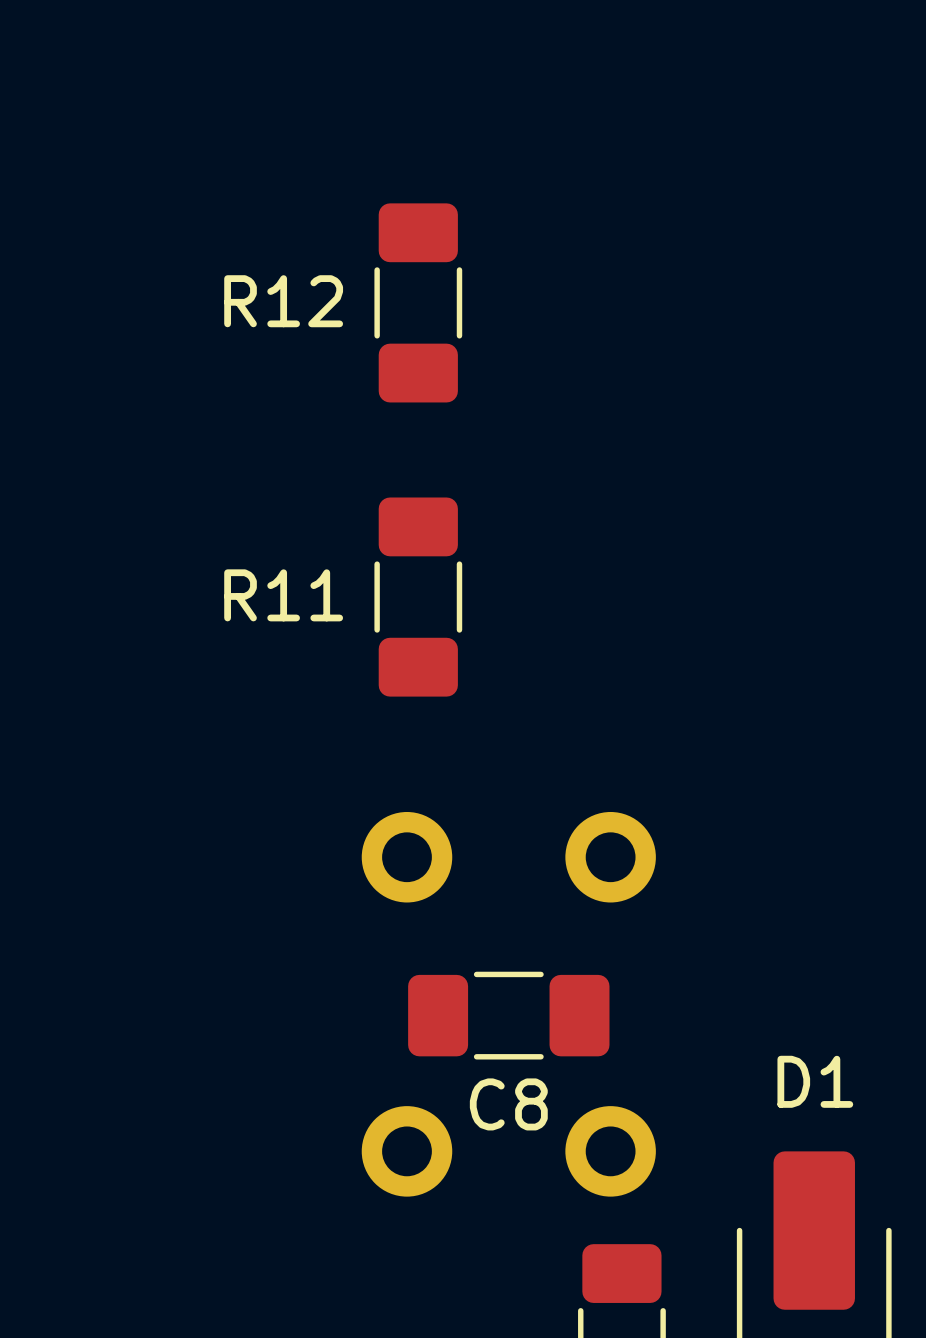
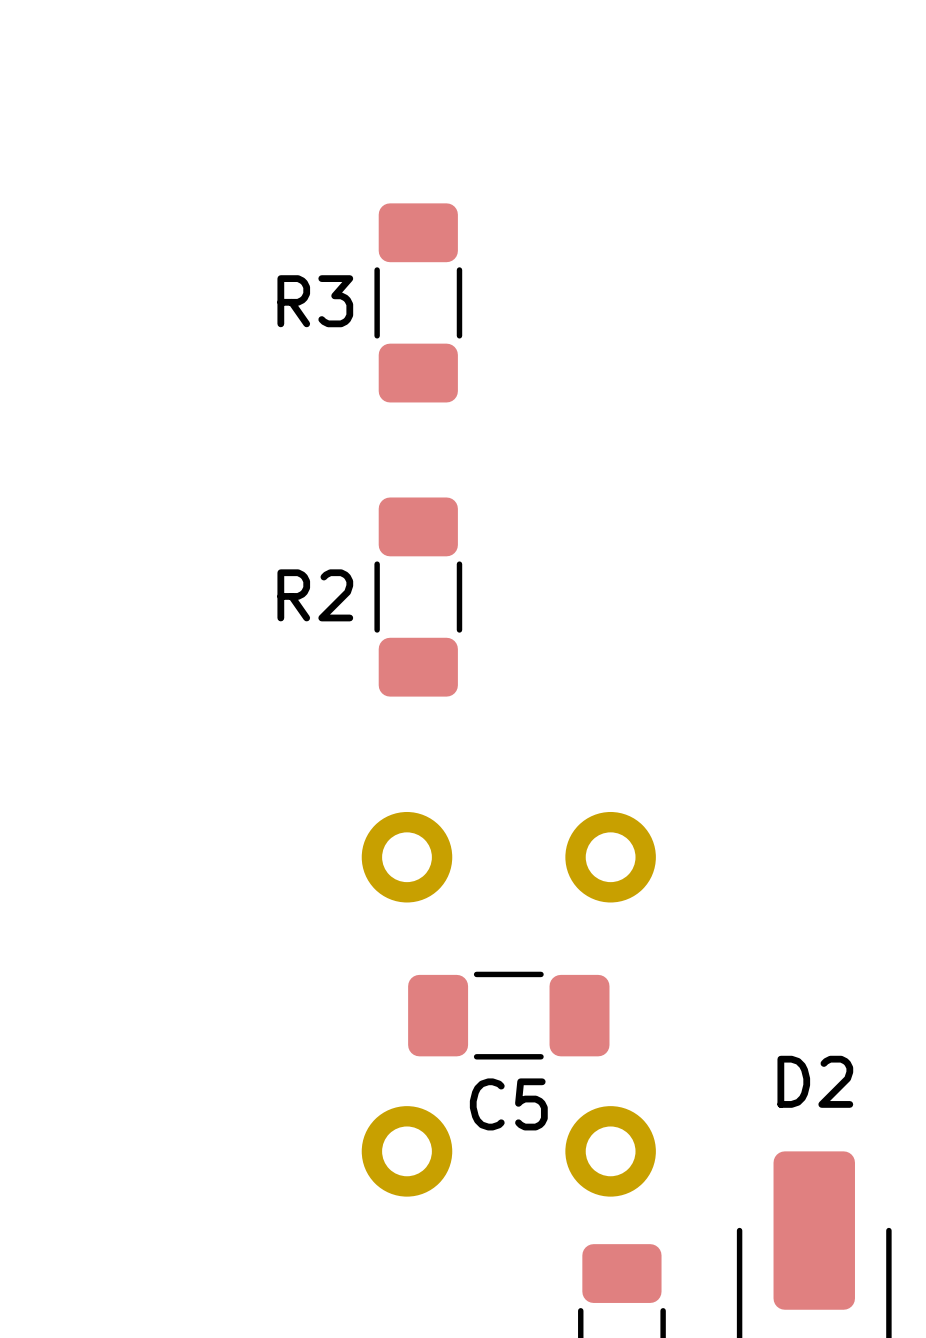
R12 name: R12 (283, 301) -> R3 (315, 301)
R11 name: R11 (283, 595) -> R2 (315, 595)
D1 name: D1 (815, 1081) -> D2 (815, 1081)
C8 name: C8 (508, 1104) -> C5 (508, 1104)

